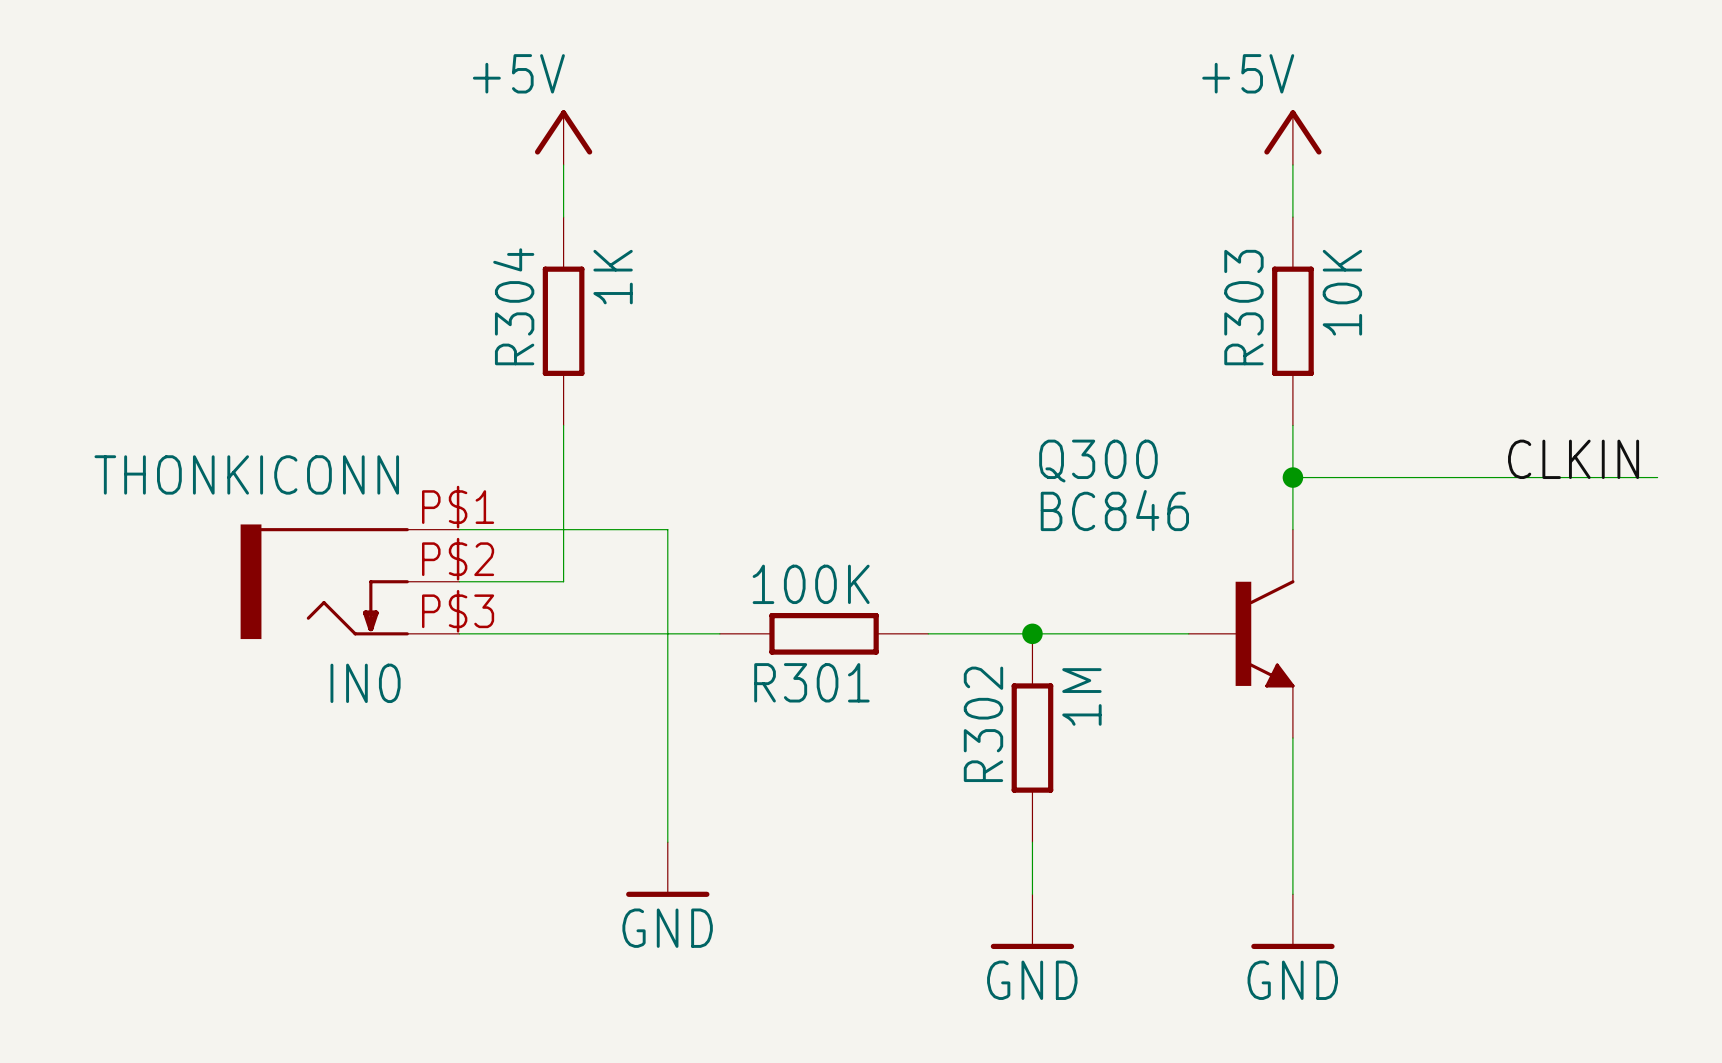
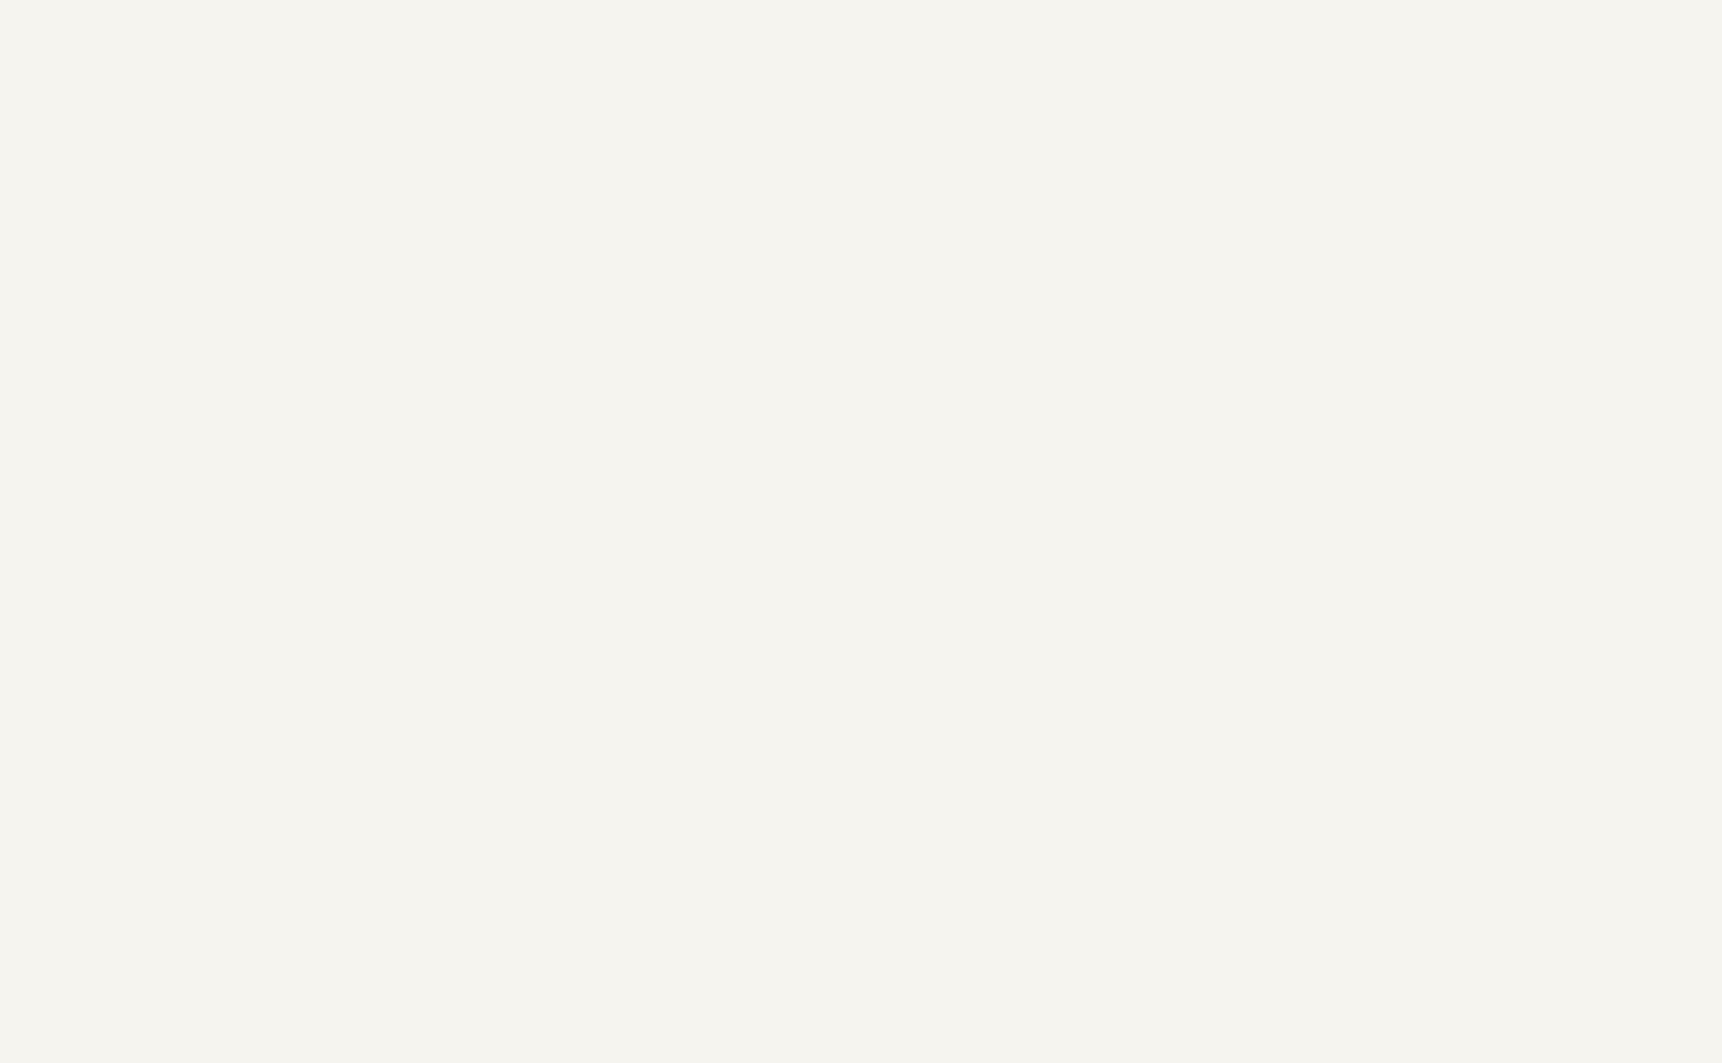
power symbol: +5V (563, 137) -> none
power symbol: +5V (1292, 137) -> none
wire: (563, 164) (563, 217) -> none
wire: (1292, 164) (1292, 217) -> none
R304: 1K (563, 321) -> none
R303: 10K (1292, 321) -> none
wire: (563, 425) (563, 581) (459, 581) -> none
wire: (1292, 425) (1292, 529) -> none
label: CLKIN (1573, 459) -> none
wire: (1292, 477) (1657, 477) -> none
junction: (1292, 477) -> none
wire: (459, 529) (667, 529) (667, 842) -> none
IN0: THONKICONN (350, 581) -> none
wire: (459, 633) (719, 633) -> none
R301: 100K (824, 633) -> none
wire: (928, 633) (1188, 633) -> none
junction: (1032, 633) -> none
Q300: BC846 (1241, 633) -> none
R302: 1M (1032, 738) -> none
wire: (1292, 738) (1292, 894) -> none
wire: (1032, 842) (1032, 894) -> none
power symbol: GND (667, 869) -> none
power symbol: GND (1032, 921) -> none
power symbol: GND (1292, 921) -> none

